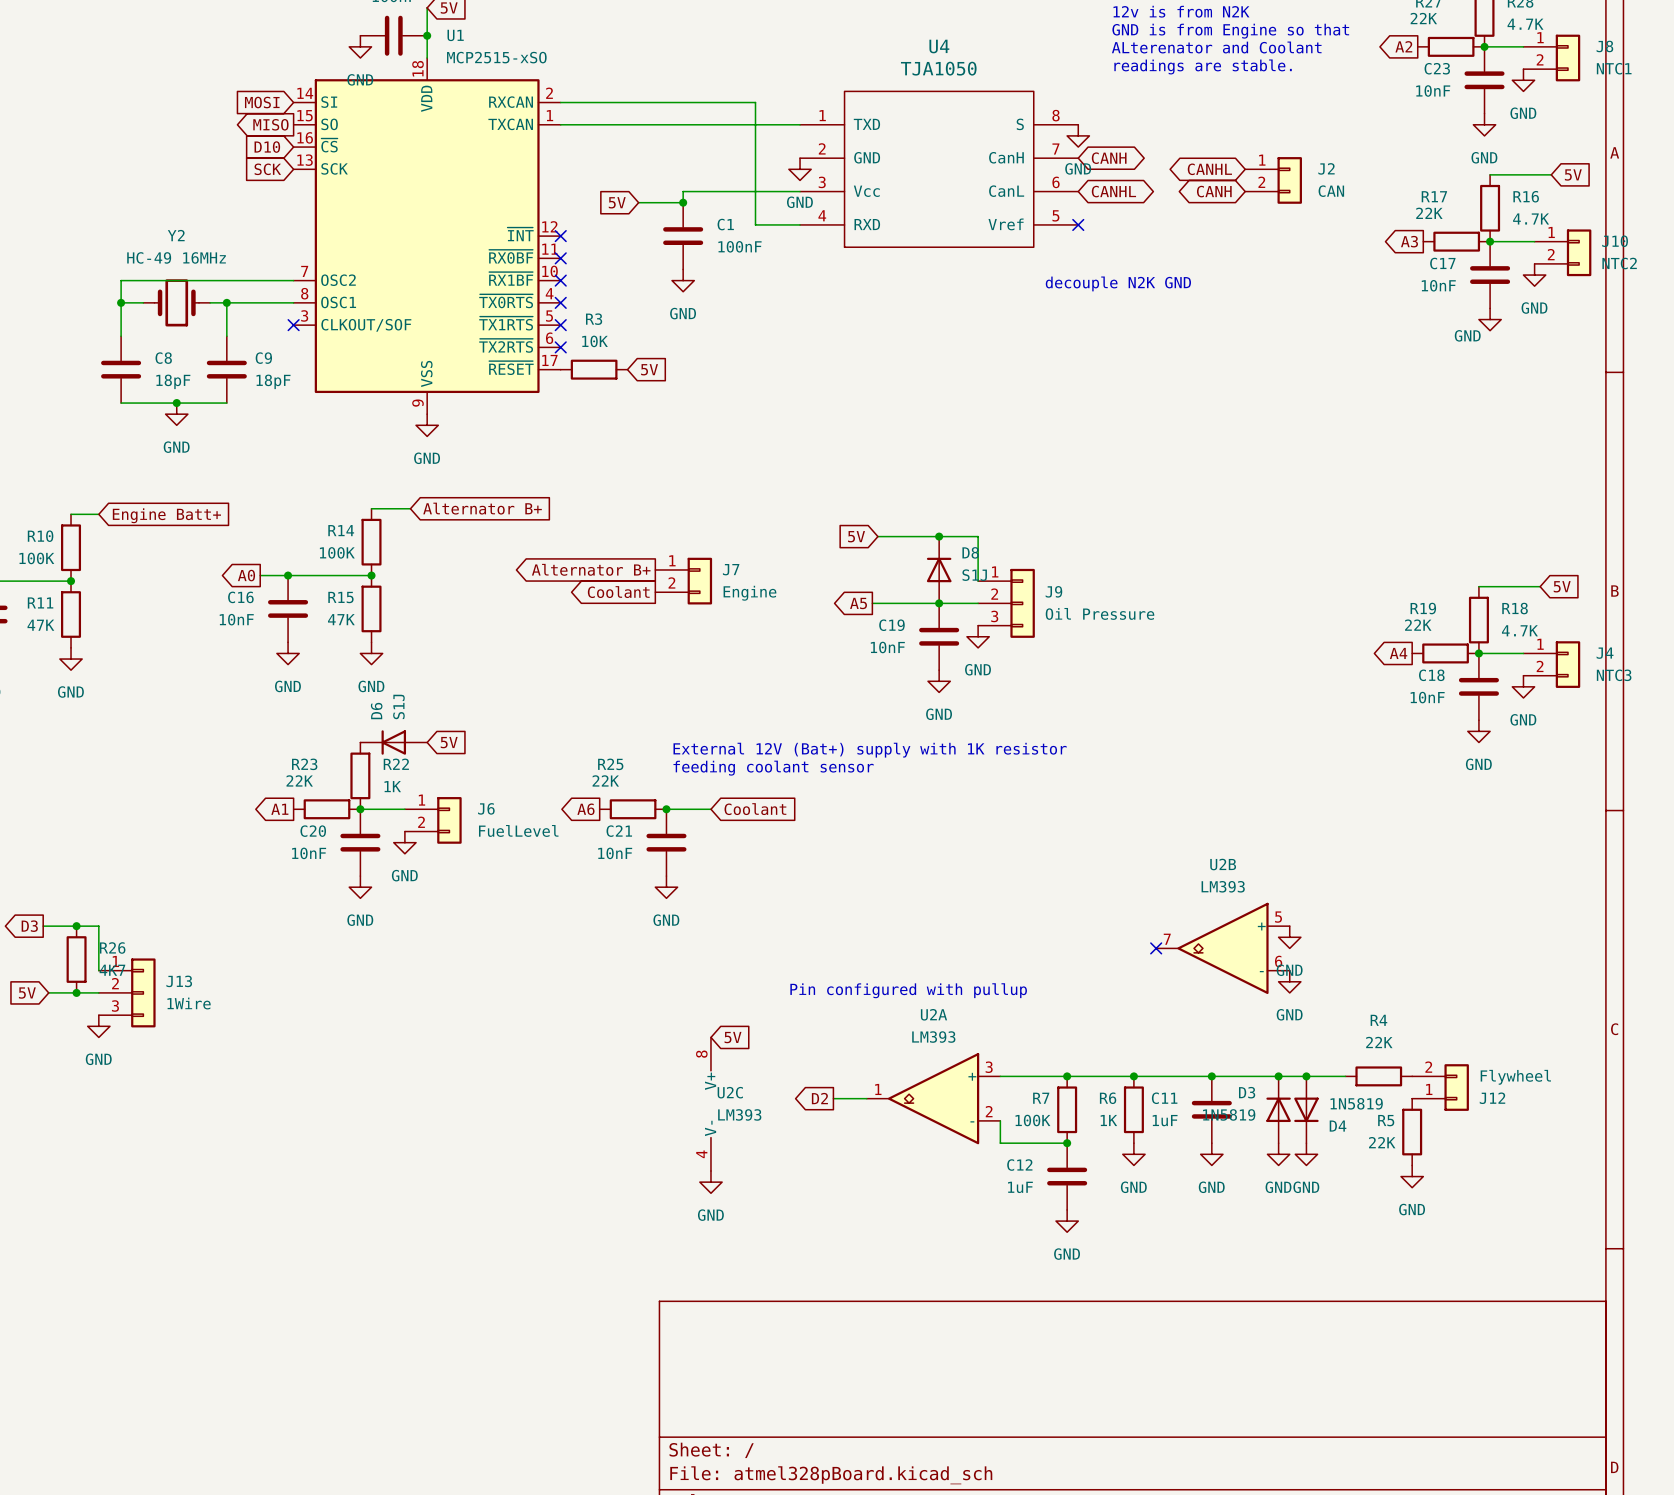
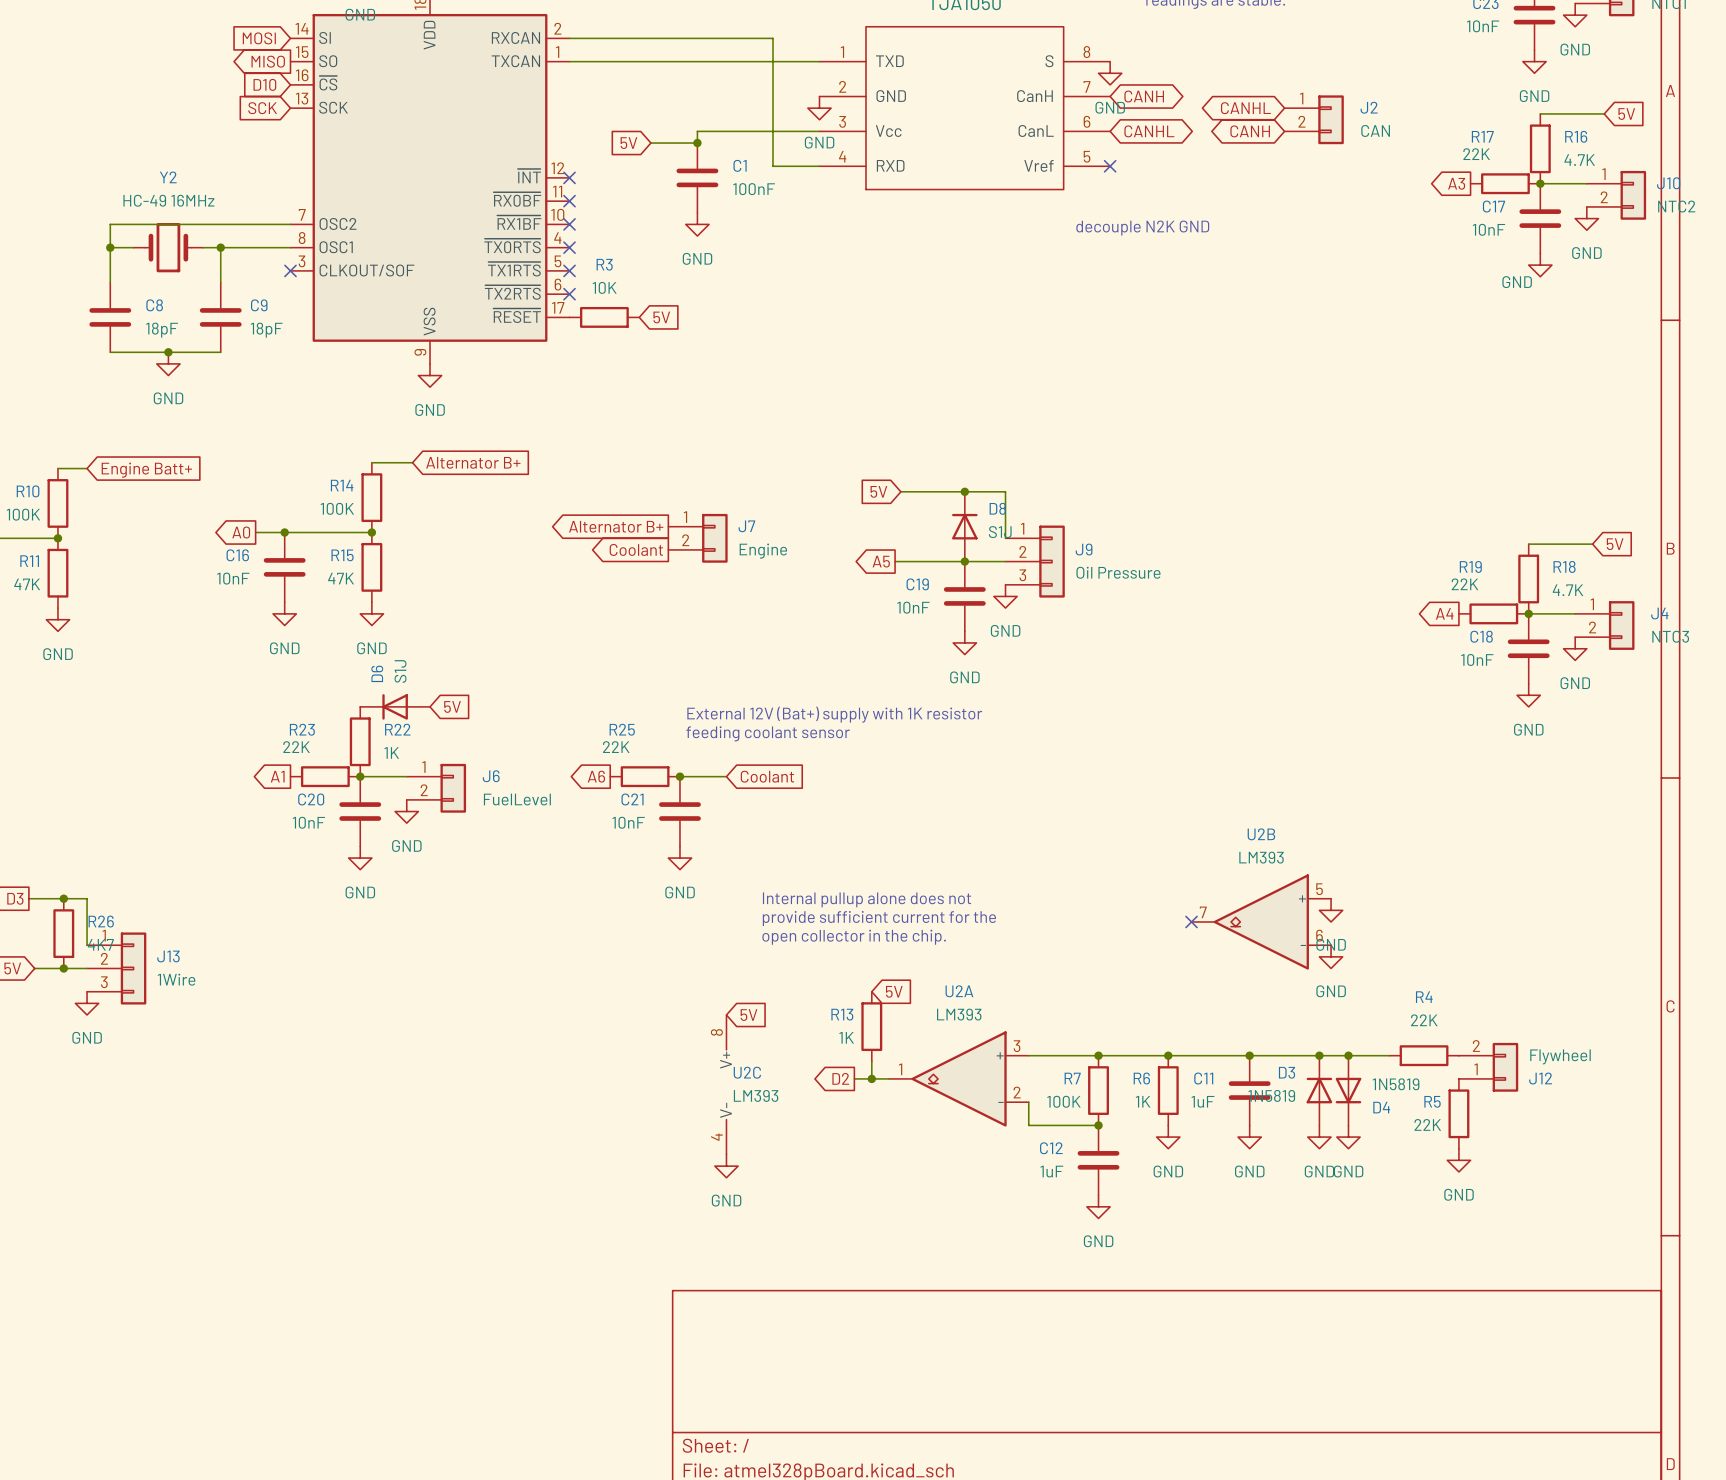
text: none -> Internal pullup alone does not (867, 899)
text: none -> provide sufficient current for the (879, 918)
text: none -> open collector in the chip. (854, 937)
text: Pin configured with pullup (908, 990) -> none
global label: none -> 5V (894, 991)
R13: none -> 1K (871, 1026)
wire: none -> (871, 1061) (871, 1078)
junction: none -> (871, 1078)

